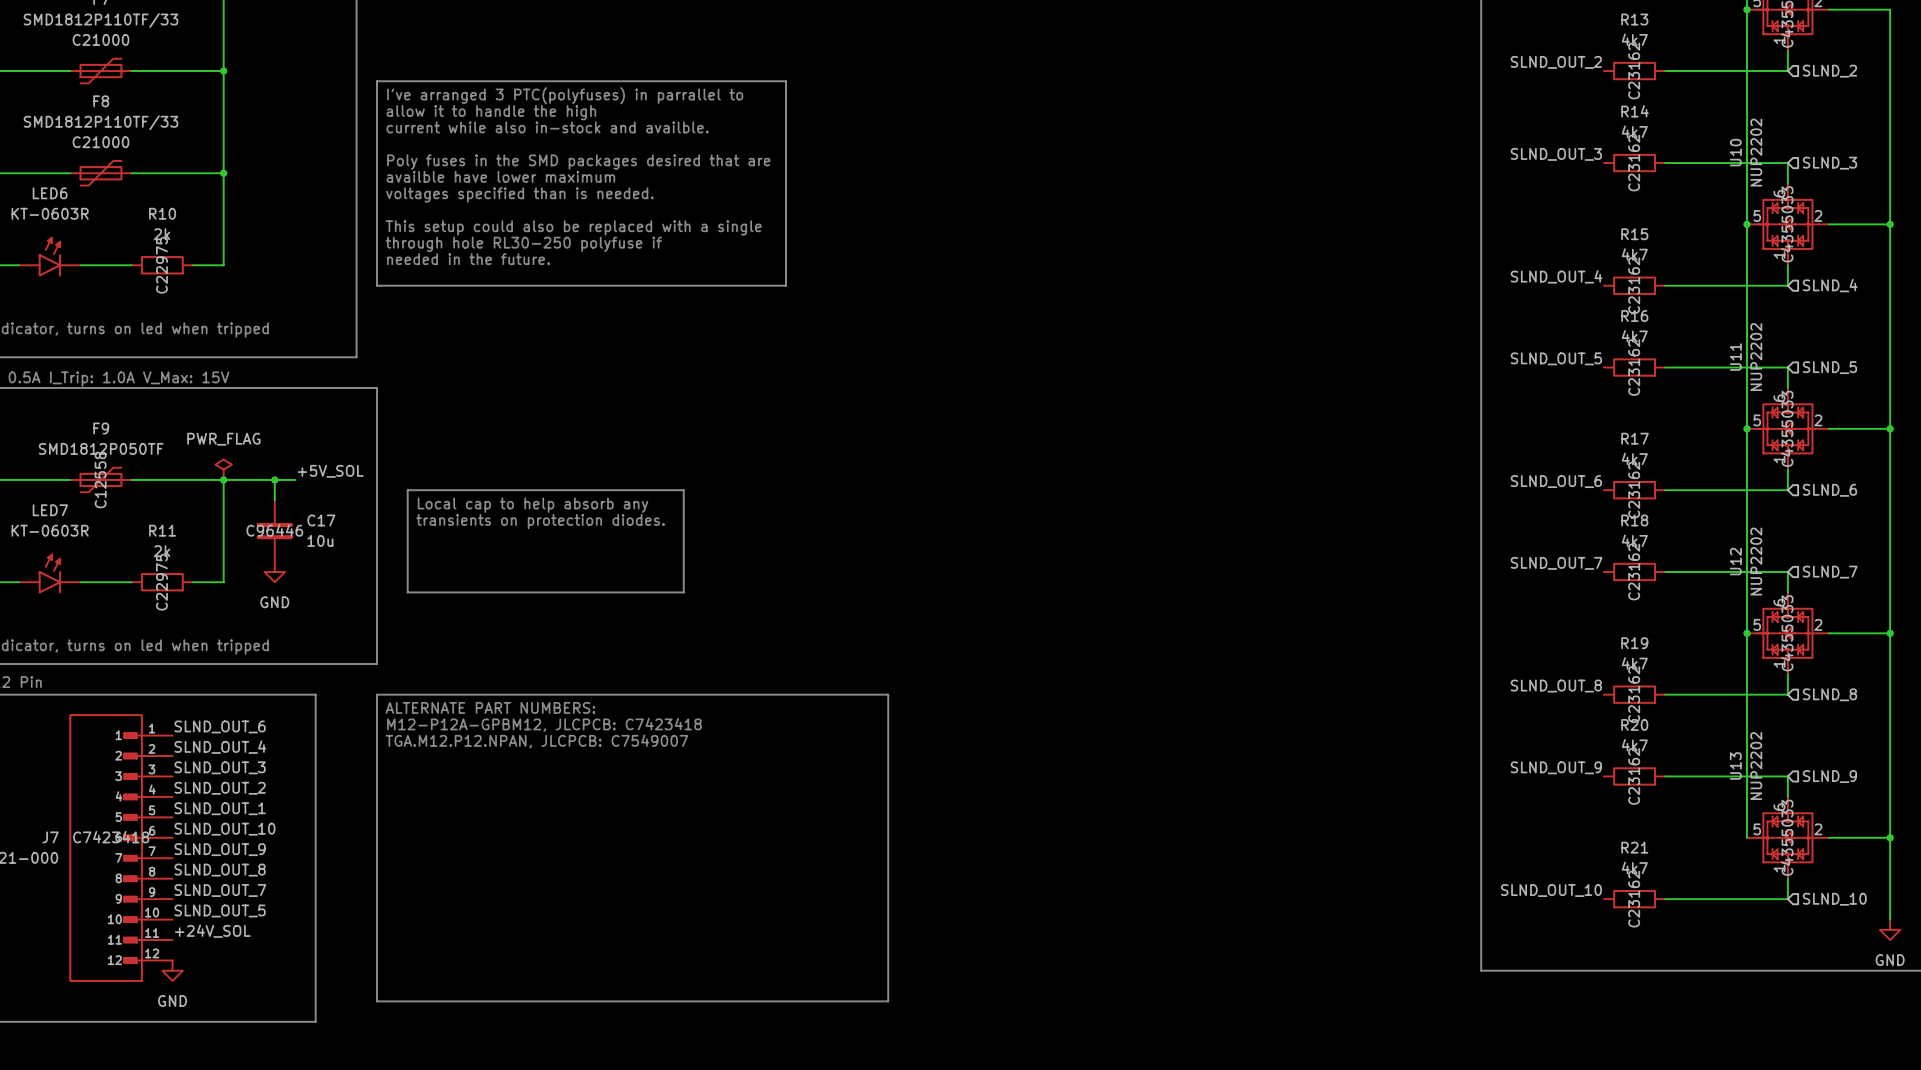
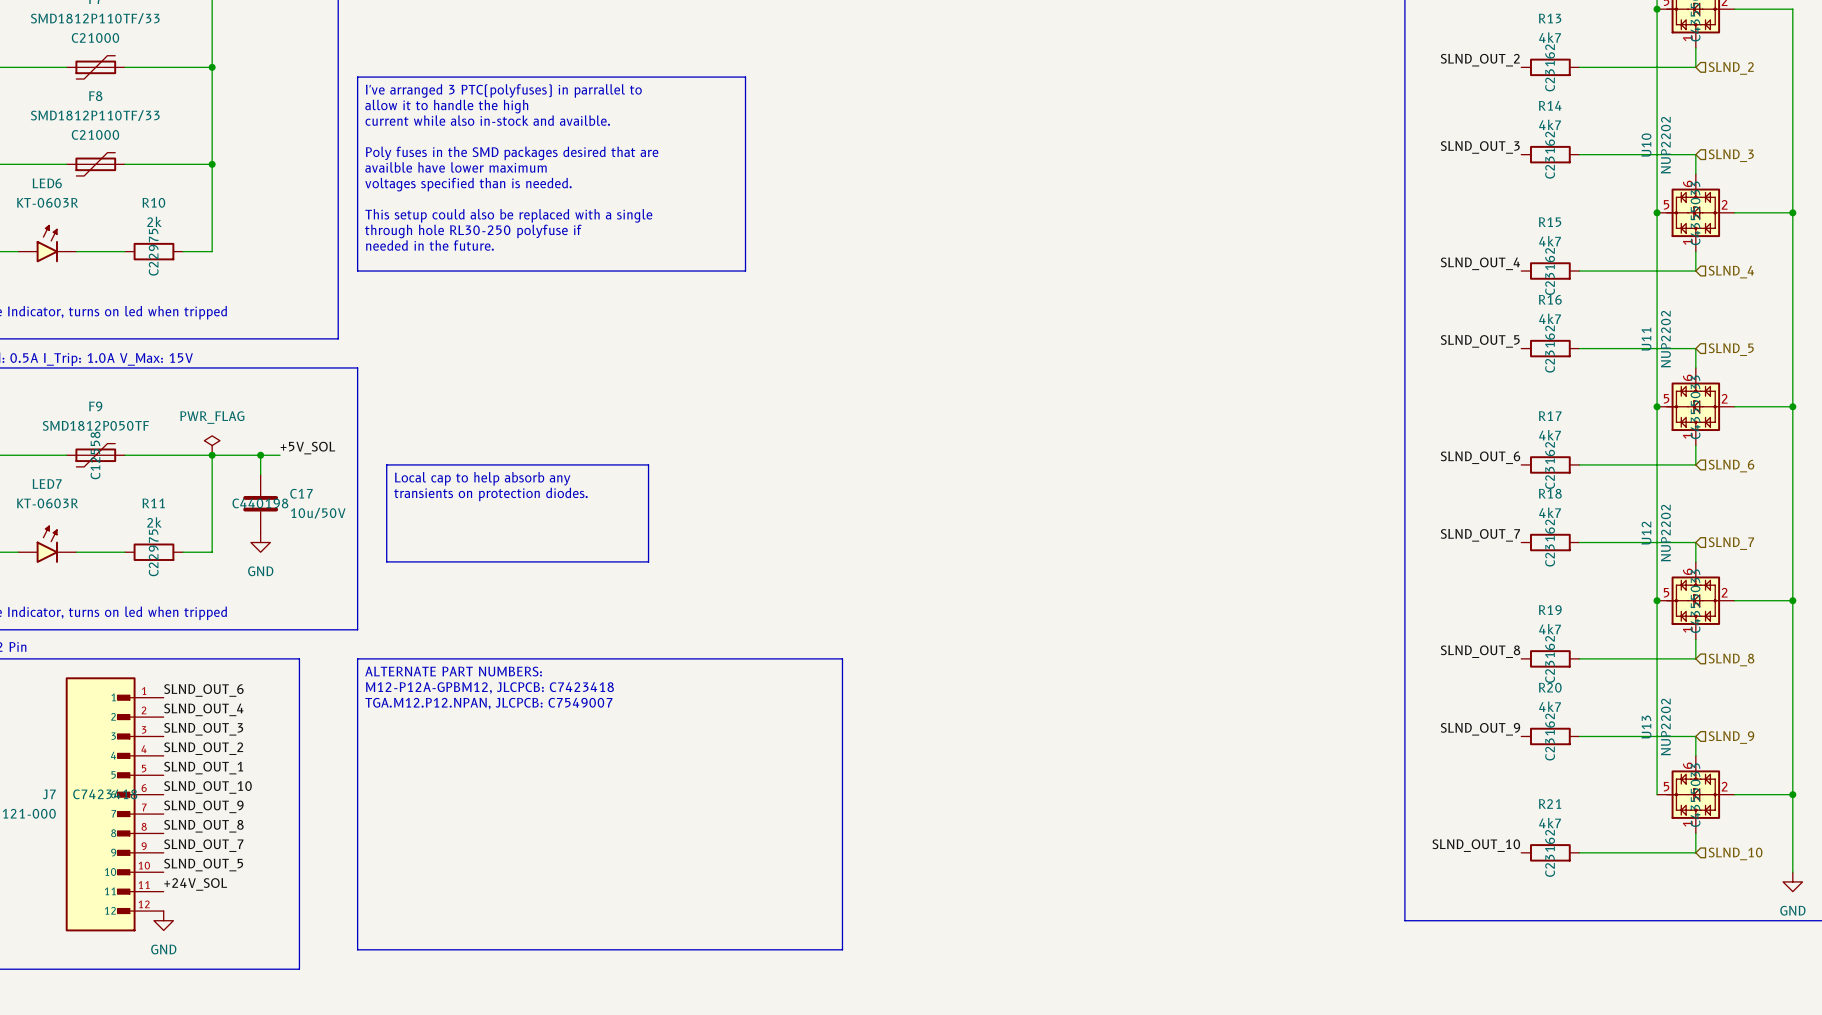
C17 text: C96446 (274, 530) -> C440198 (260, 503)
C17 value: 10u (320, 540) -> 10u/50V (318, 513)

